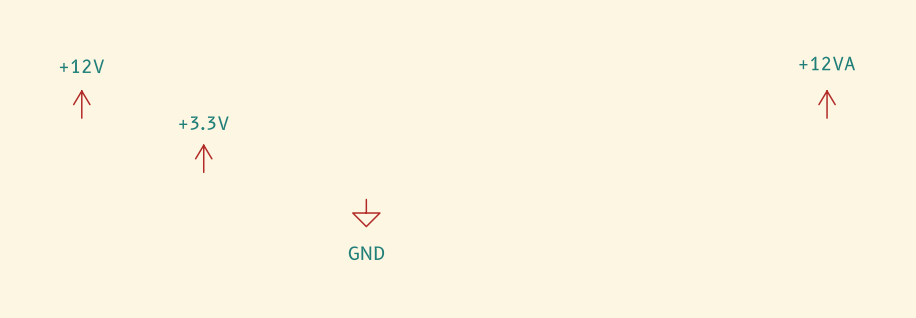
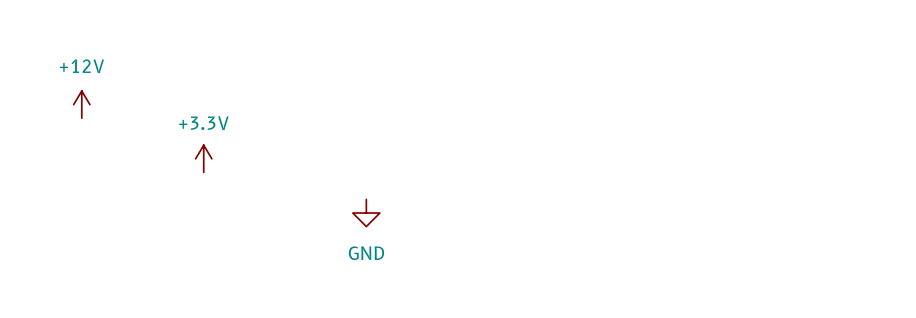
power symbol: +12VA (827, 104) -> none

